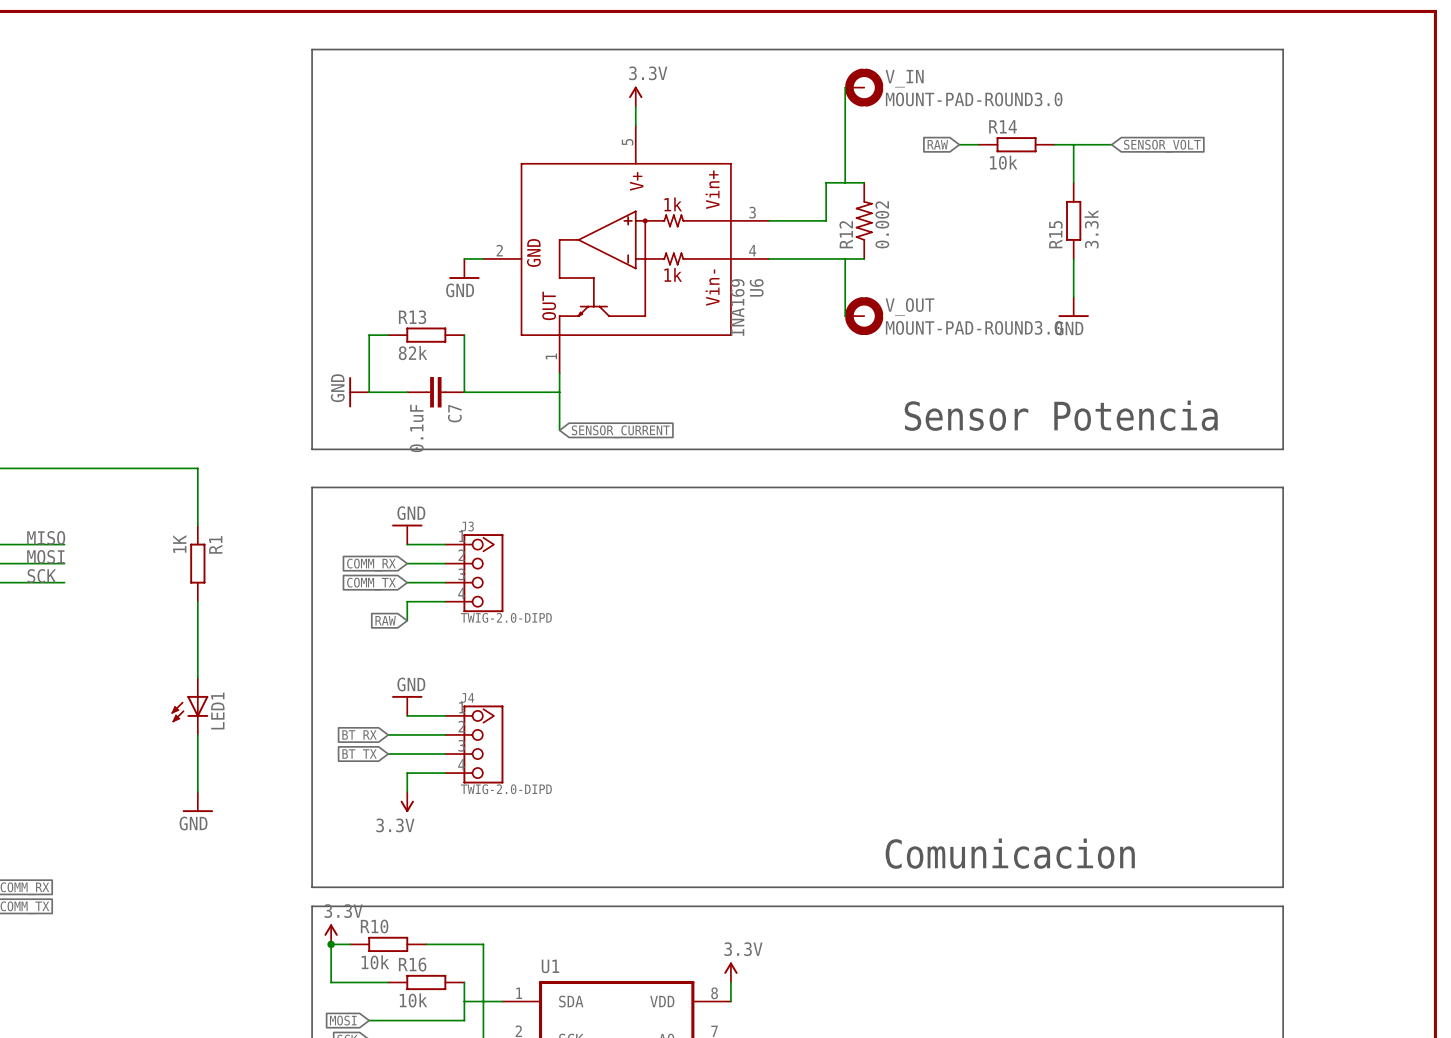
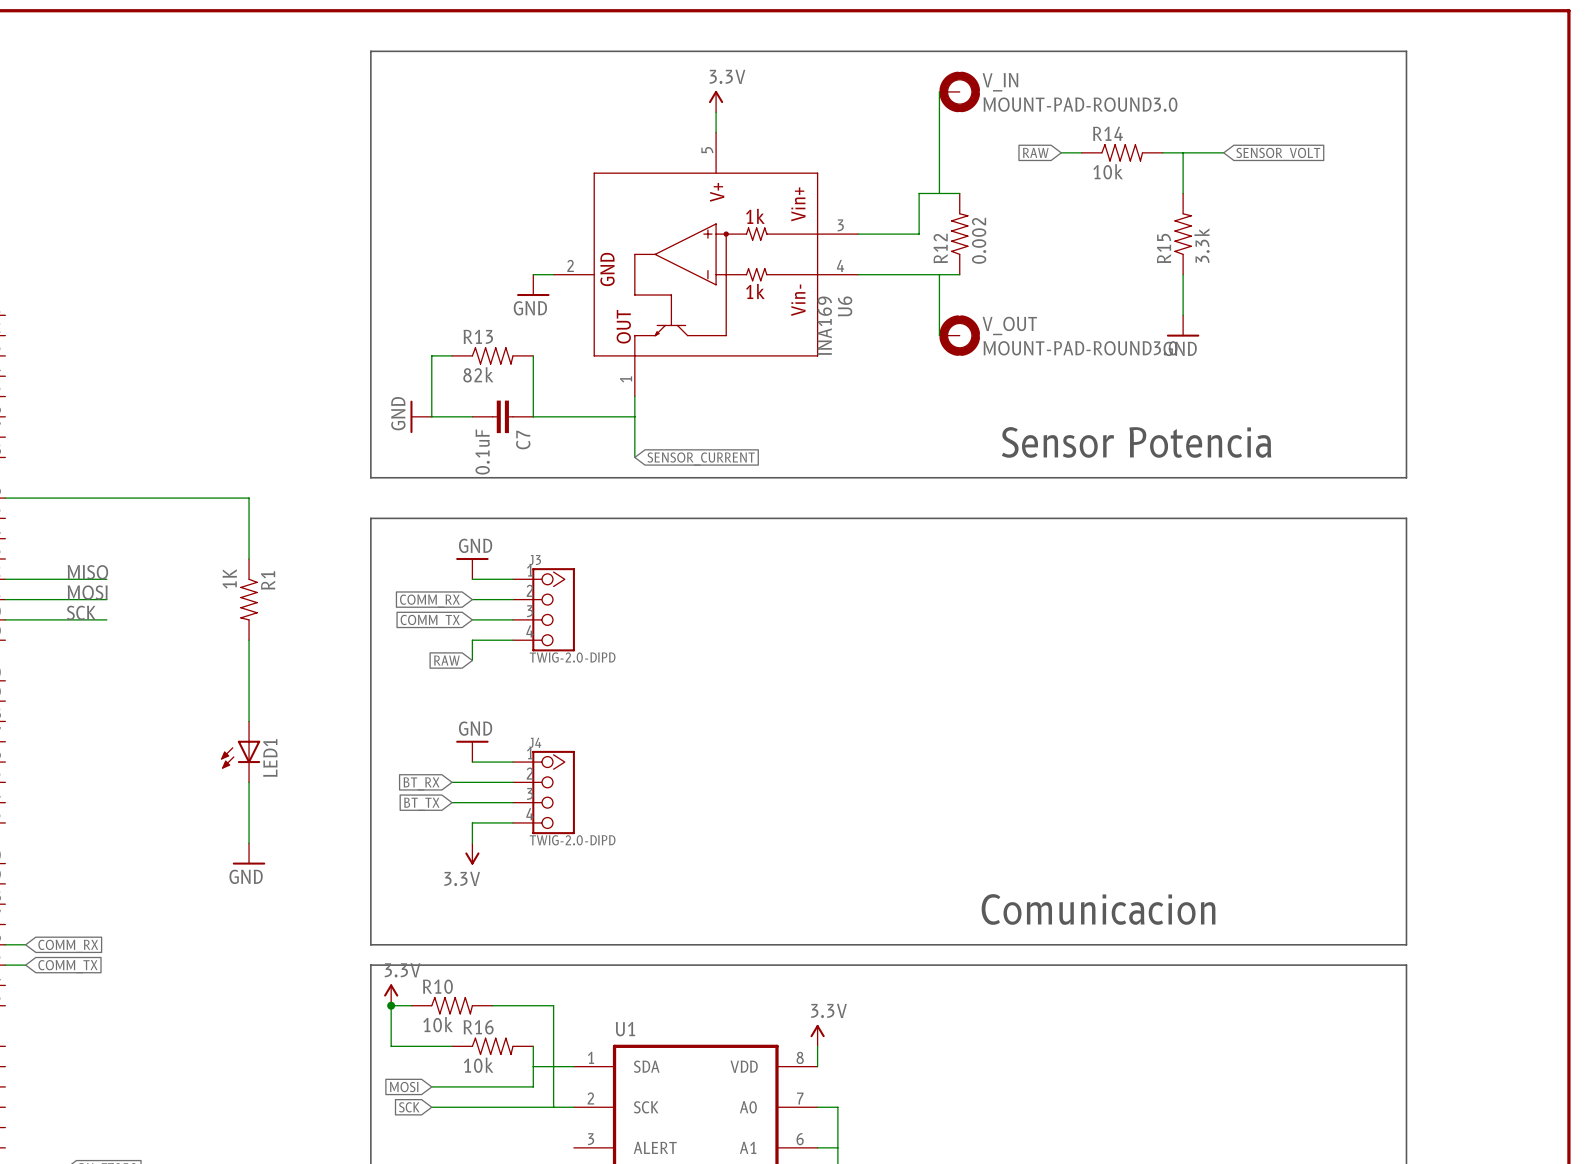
R14 symbol: [978, 137, 1055, 153] -> [1081, 144, 1163, 162]
R15 symbol: [1066, 182, 1082, 259] -> [1174, 193, 1192, 275]
R13 symbol: [388, 327, 465, 343] -> [452, 347, 534, 365]
R1 symbol: [190, 525, 206, 602] -> [240, 558, 258, 641]
R10 symbol: [350, 936, 427, 953] -> [411, 996, 493, 1015]
R16 symbol: [388, 974, 465, 991] -> [452, 1037, 534, 1056]

